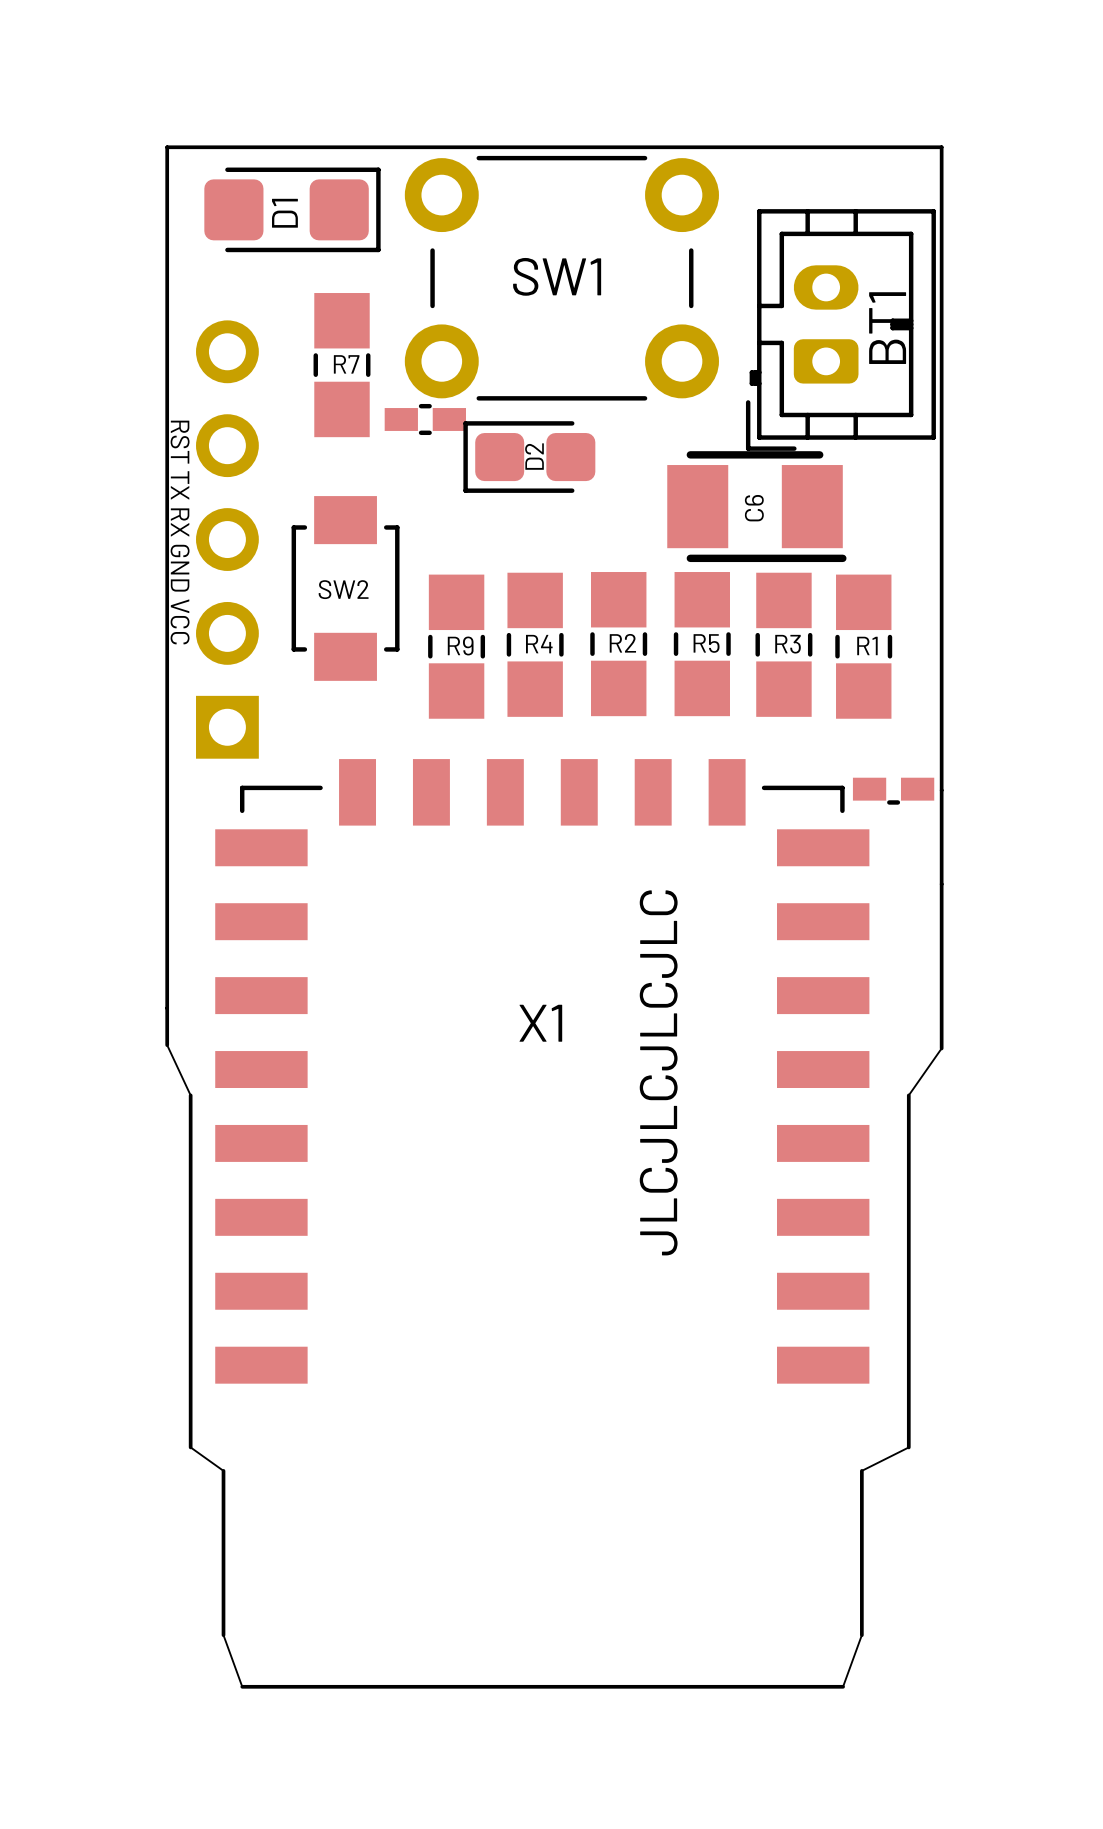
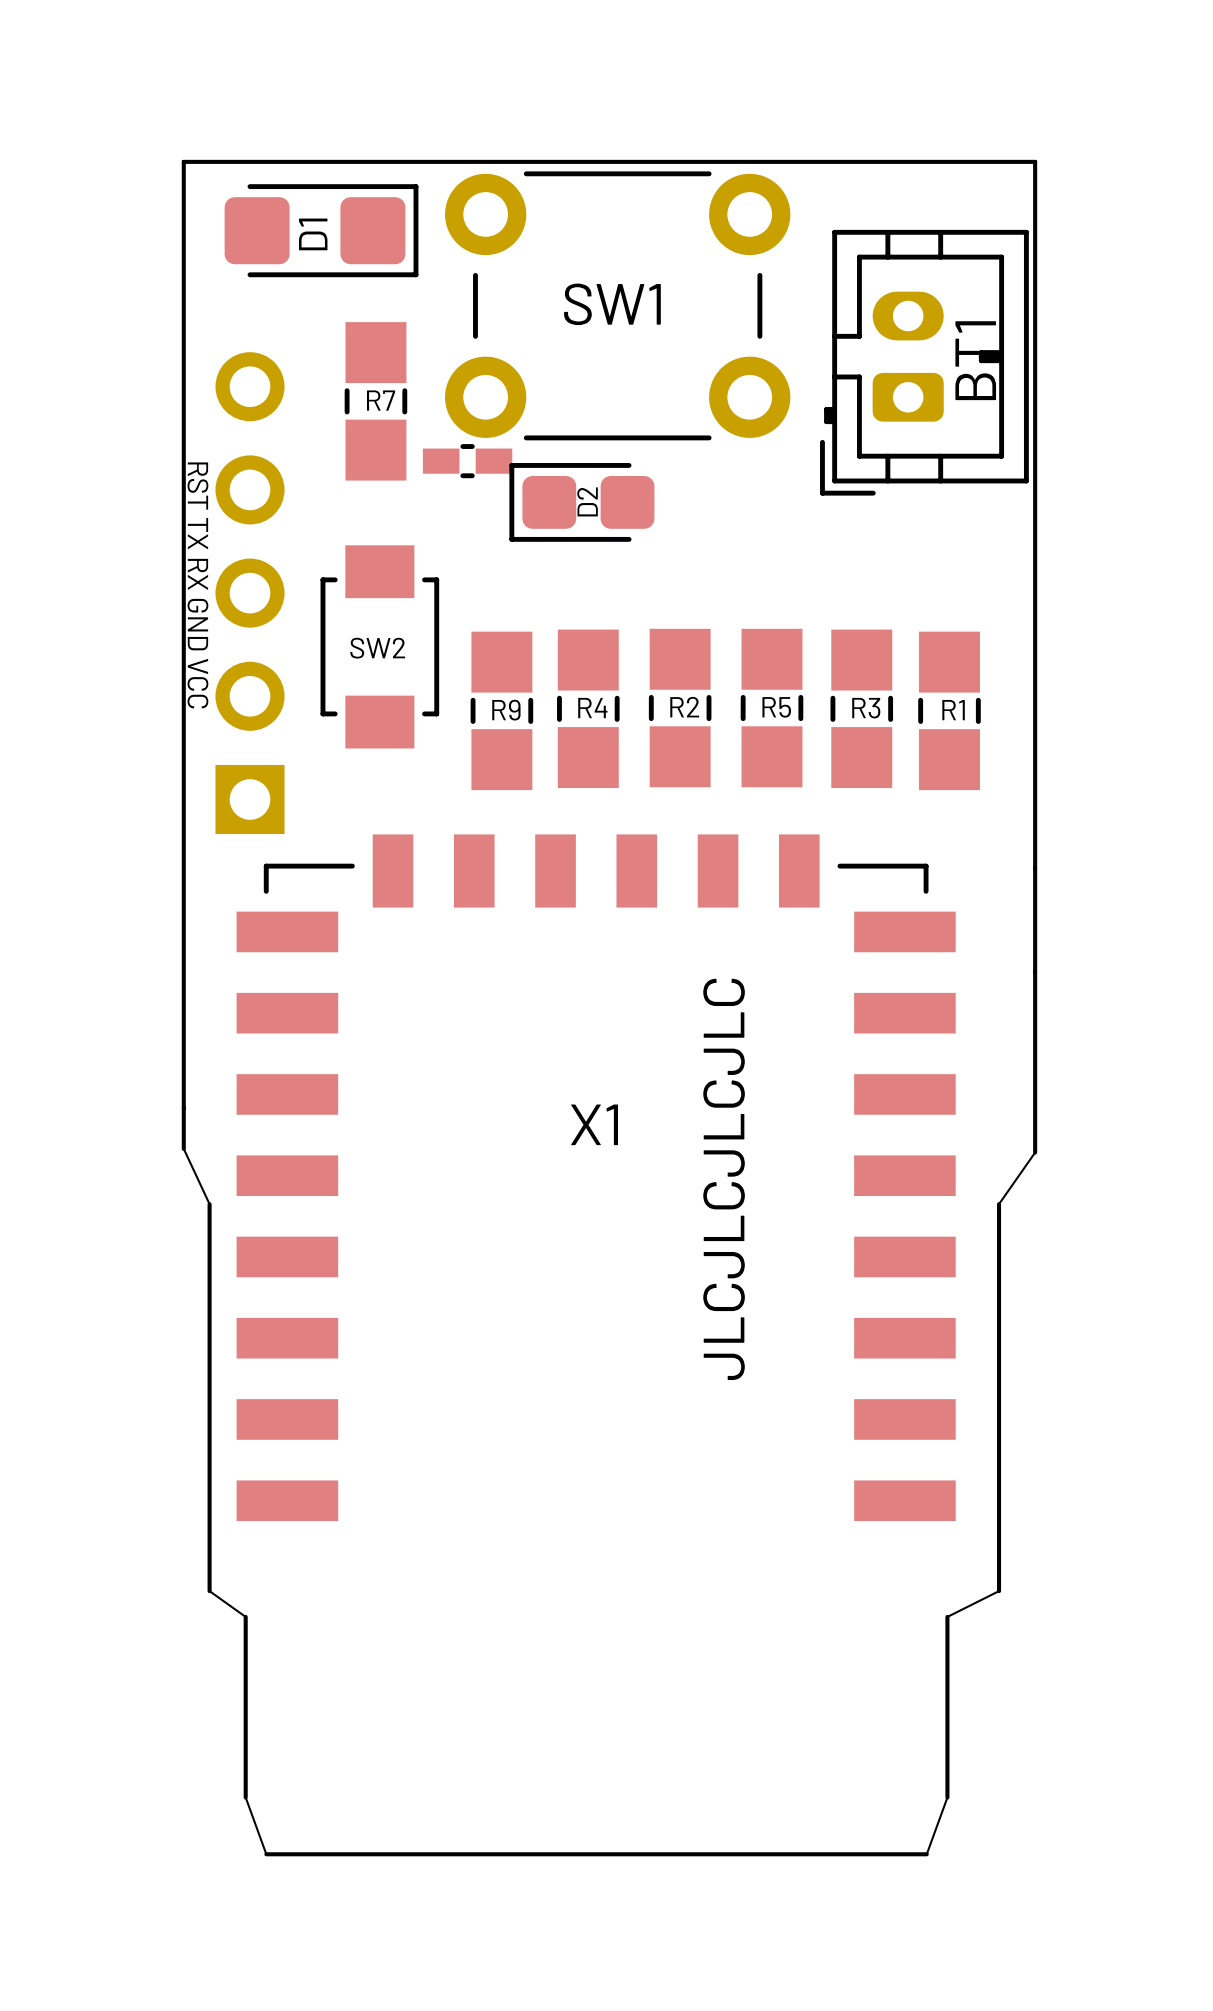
C6: (756, 506) -> none
part: (893, 791) -> none

